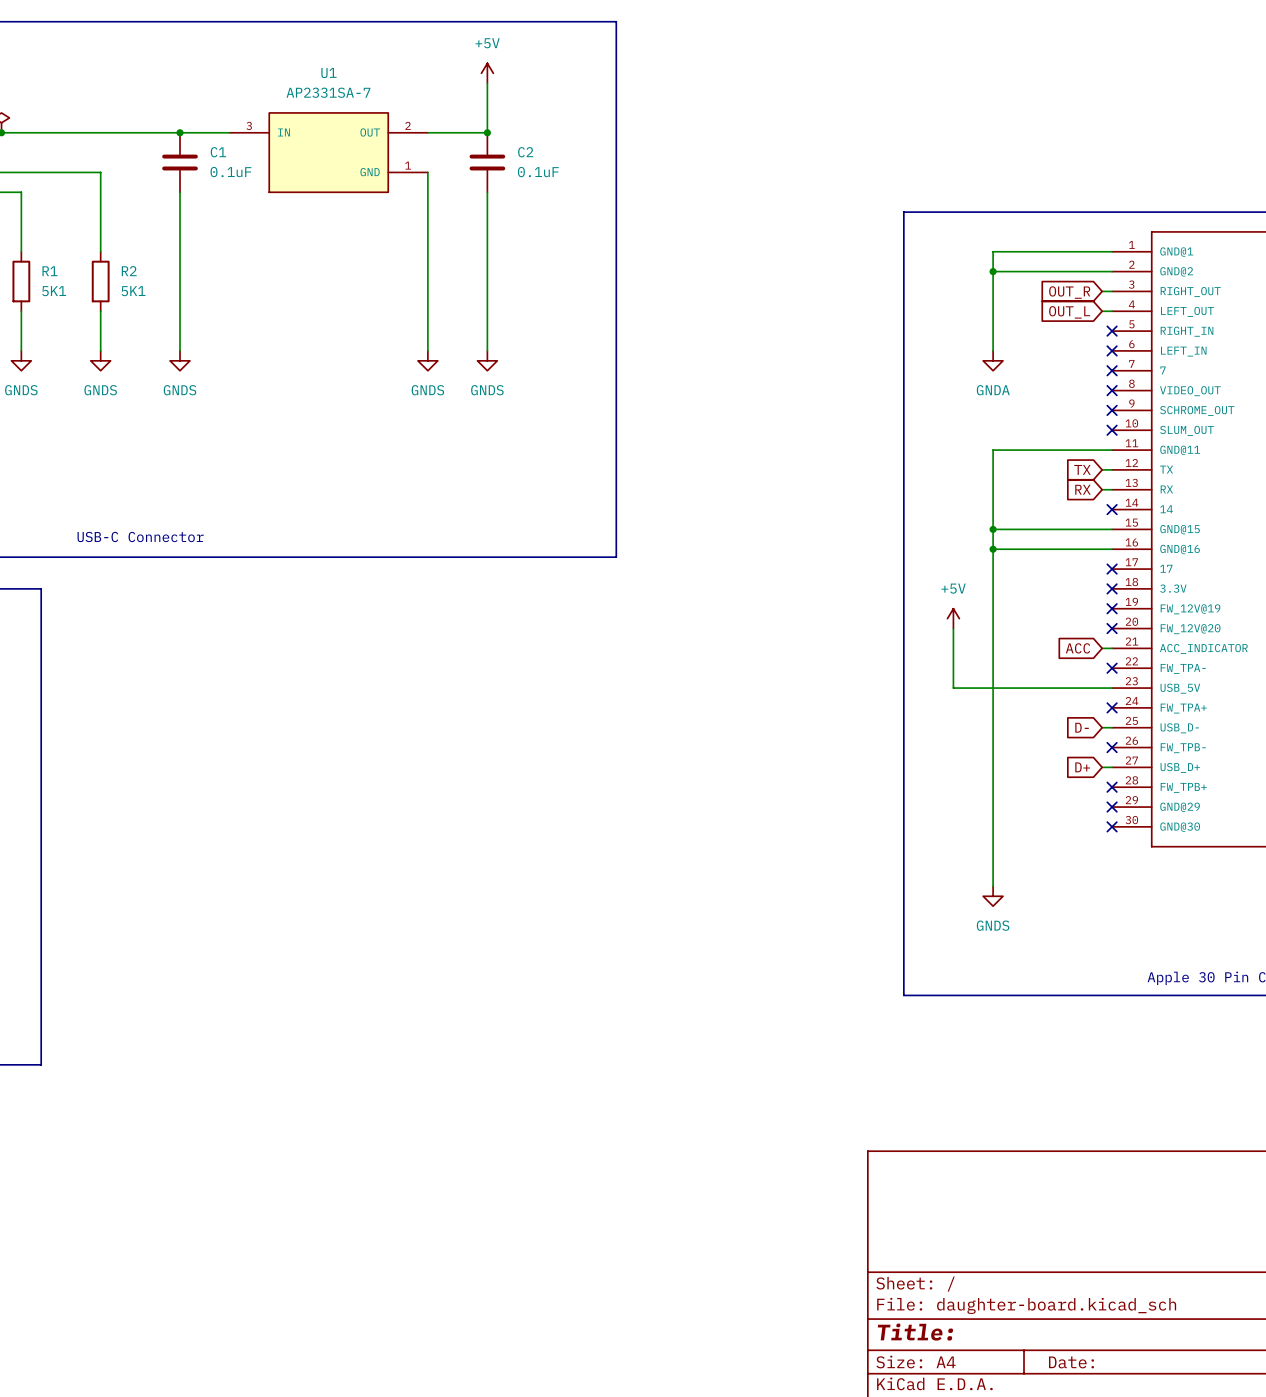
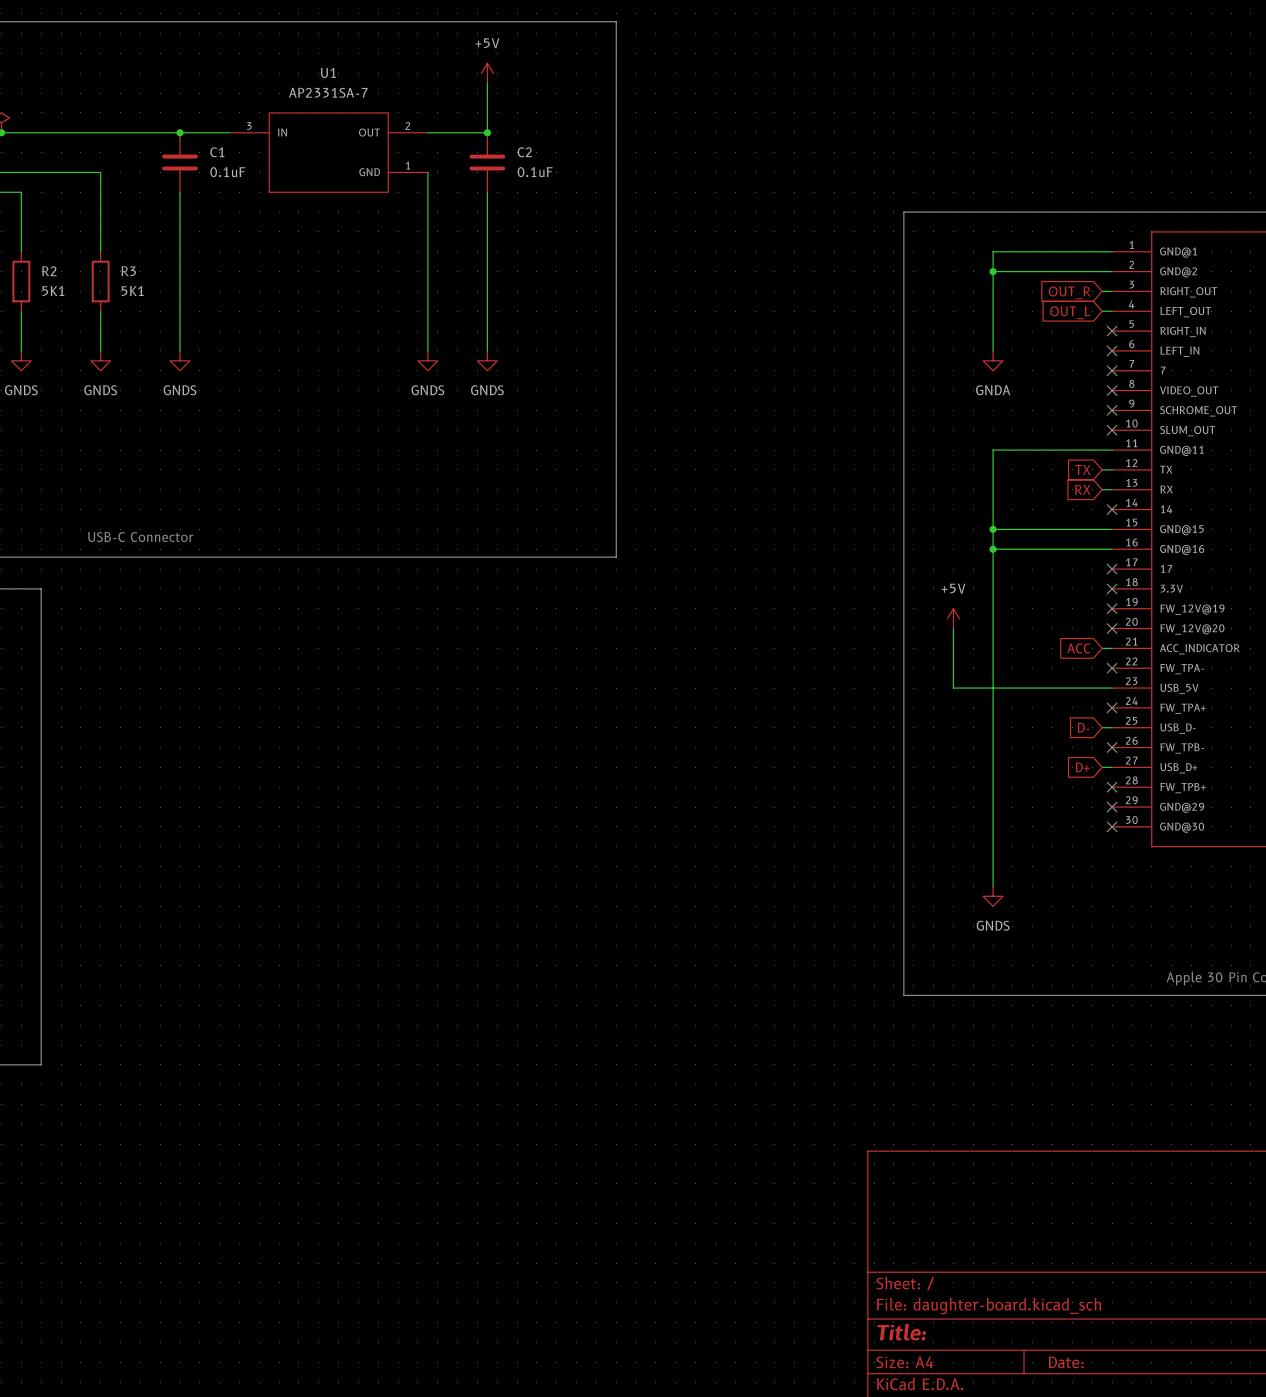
R1 name: R1 (50, 271) -> R2 (49, 271)
R2 name: R2 (129, 271) -> R3 (128, 271)

